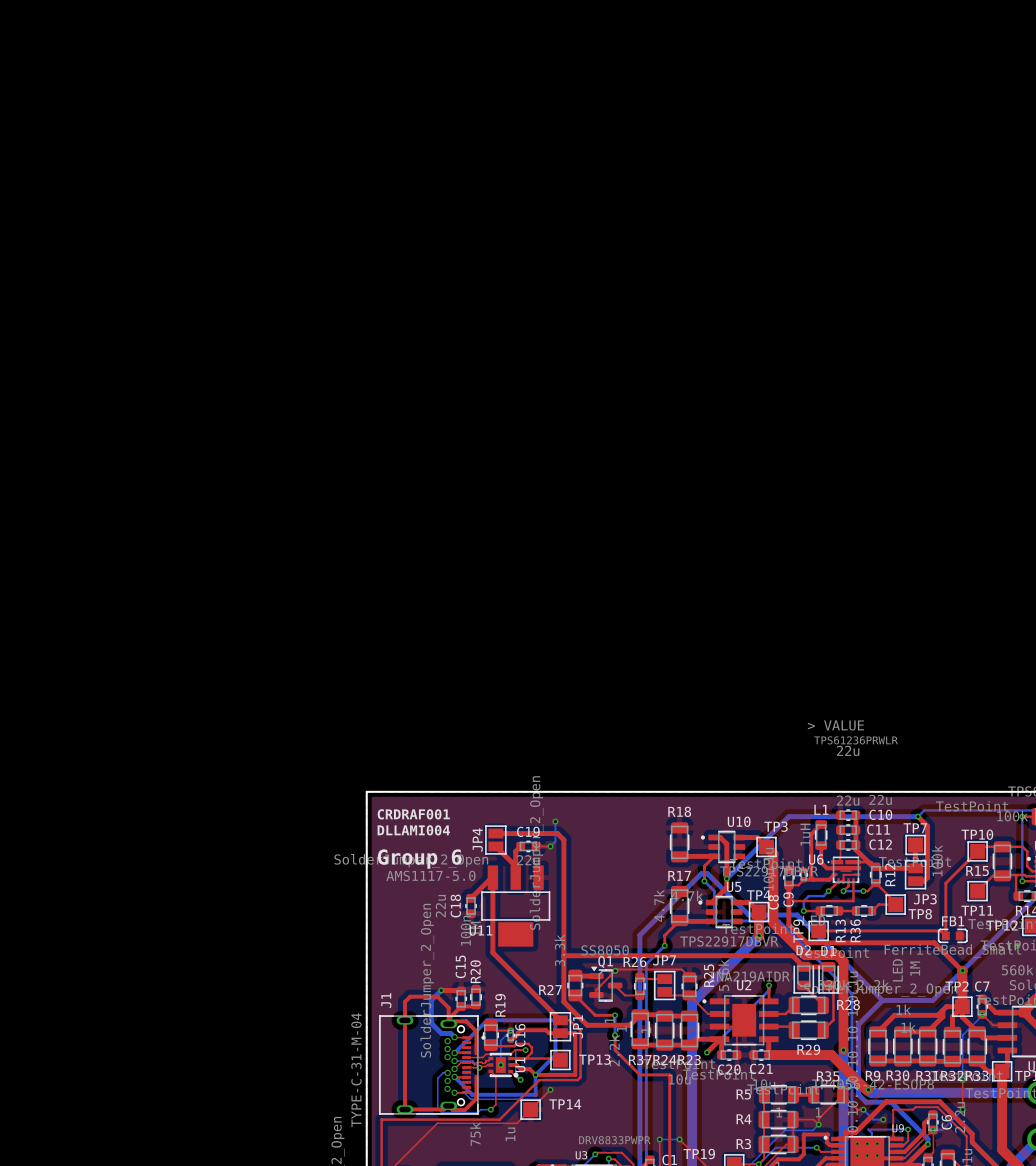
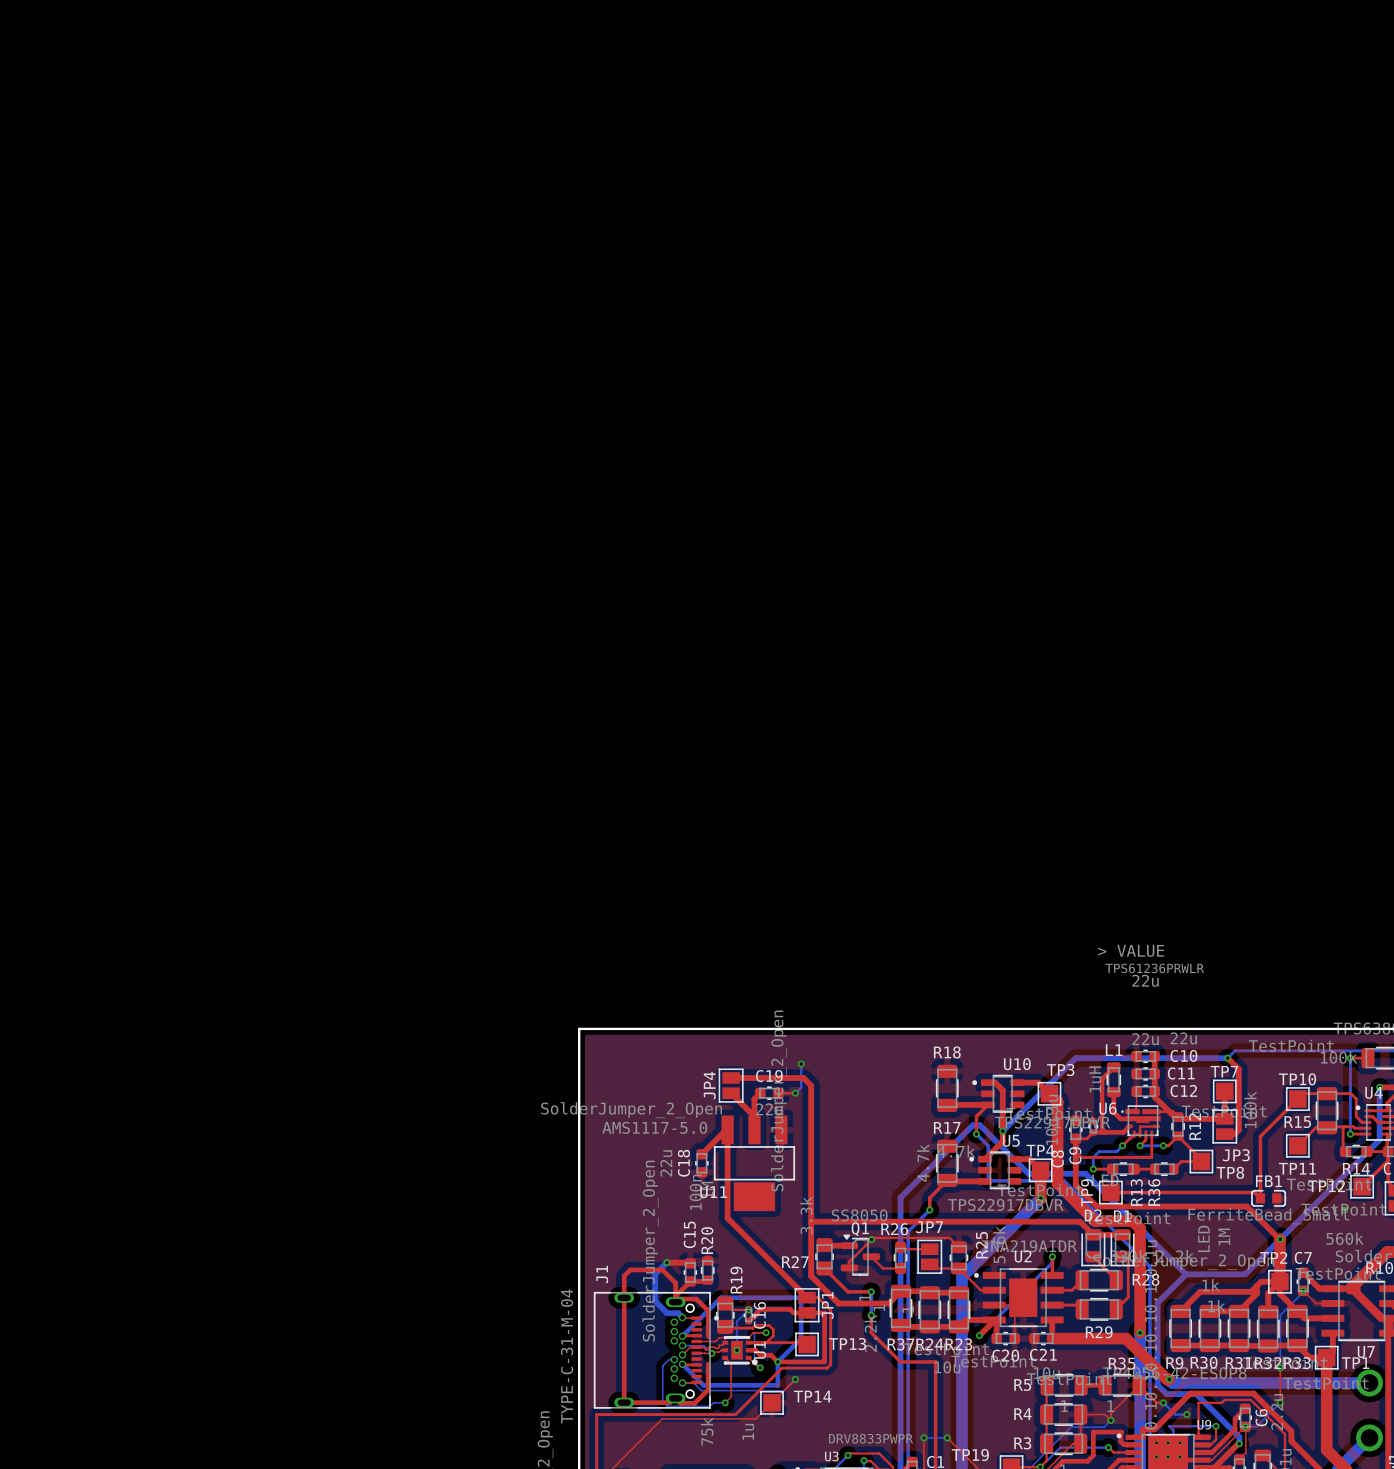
text: CRDRAF001 (413, 814) -> none
text: DLLAMI004 (413, 830) -> none
text: Group 6 (419, 859) -> none

